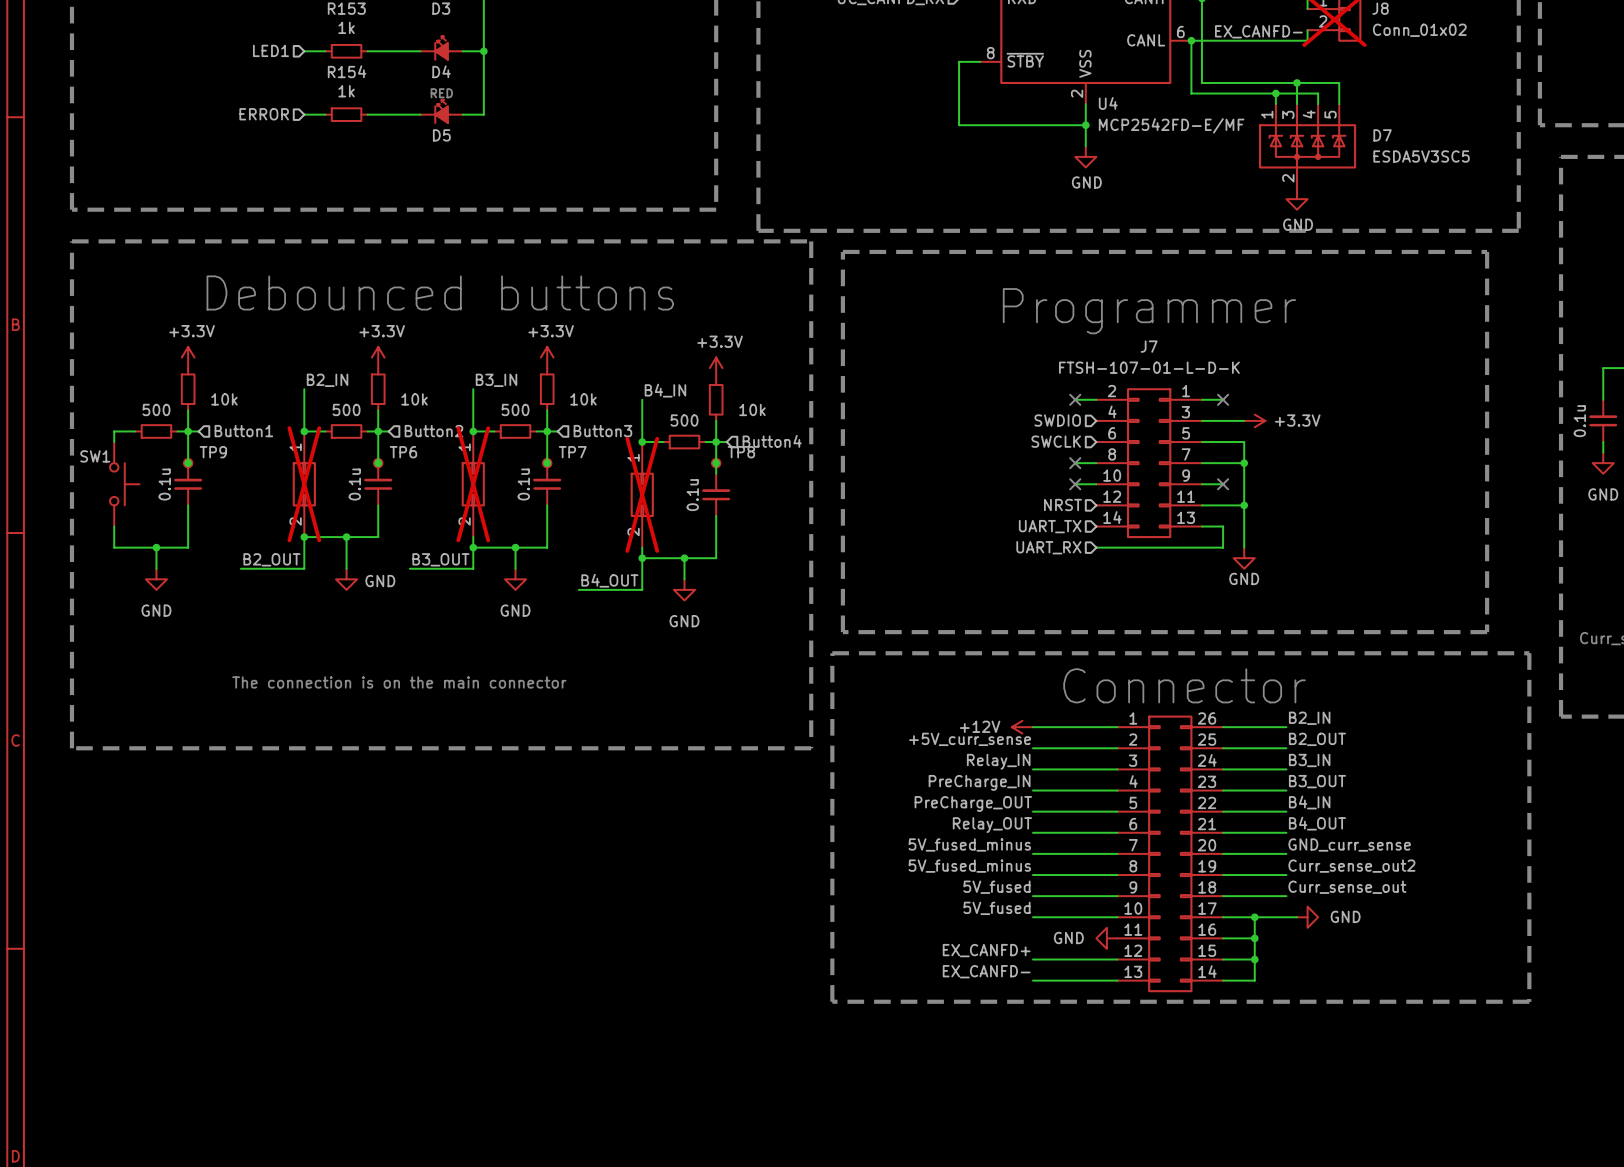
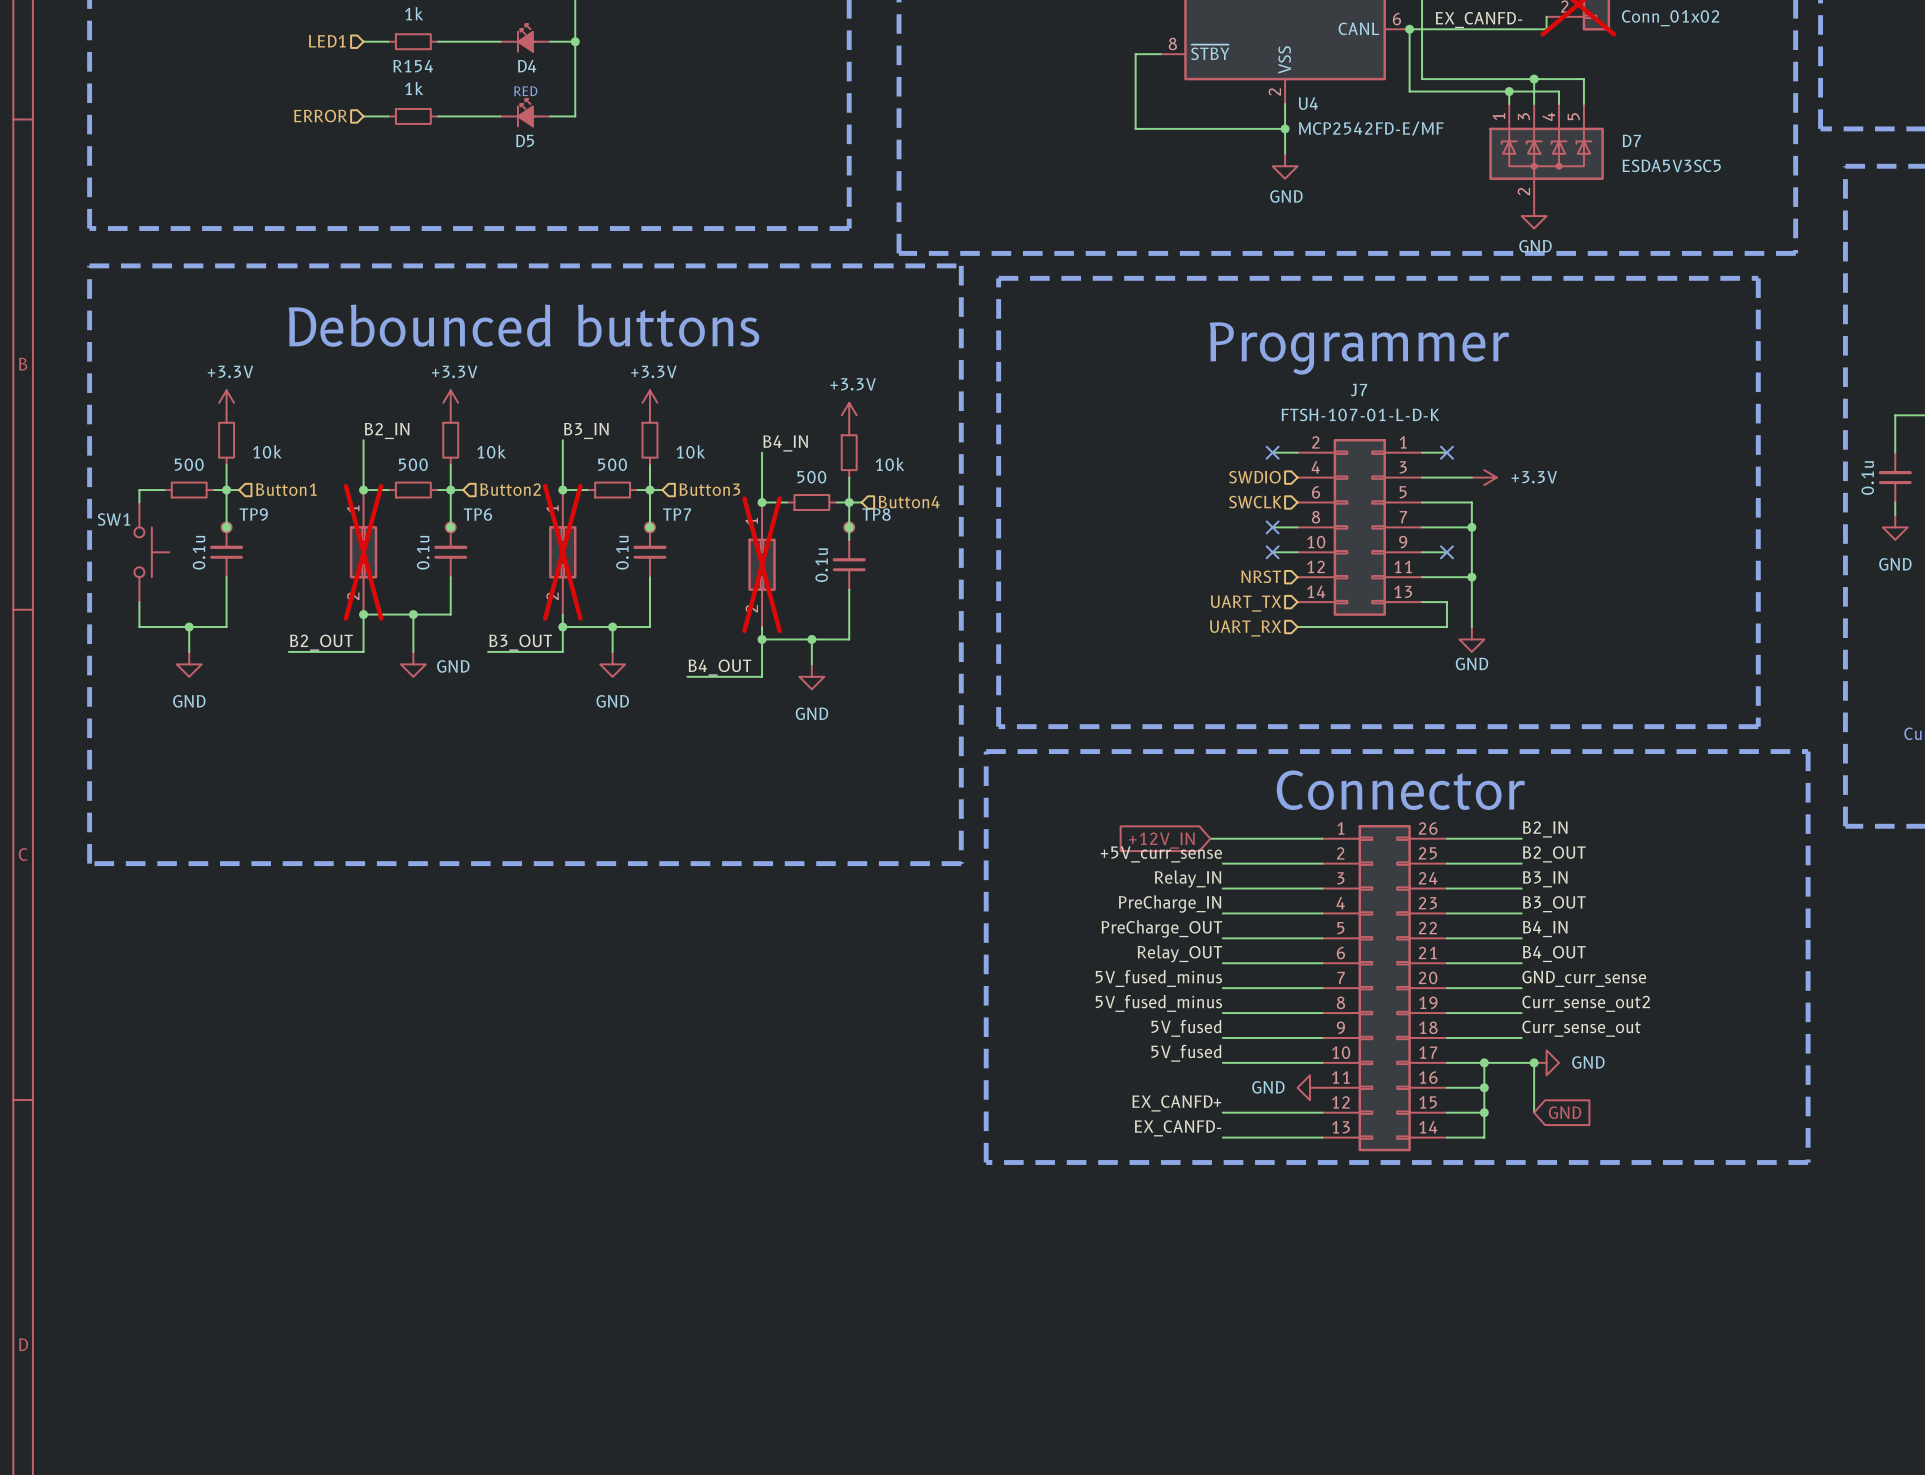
text: The connection is on the main connector (399, 682) -> none
global label: none -> +12V_IN (1161, 840)
power symbol: +12V (1022, 727) -> none
wire: none -> (1534, 1062) (1534, 1112)
junction: none -> (1534, 1062)
global label: none -> GND (1565, 1112)

